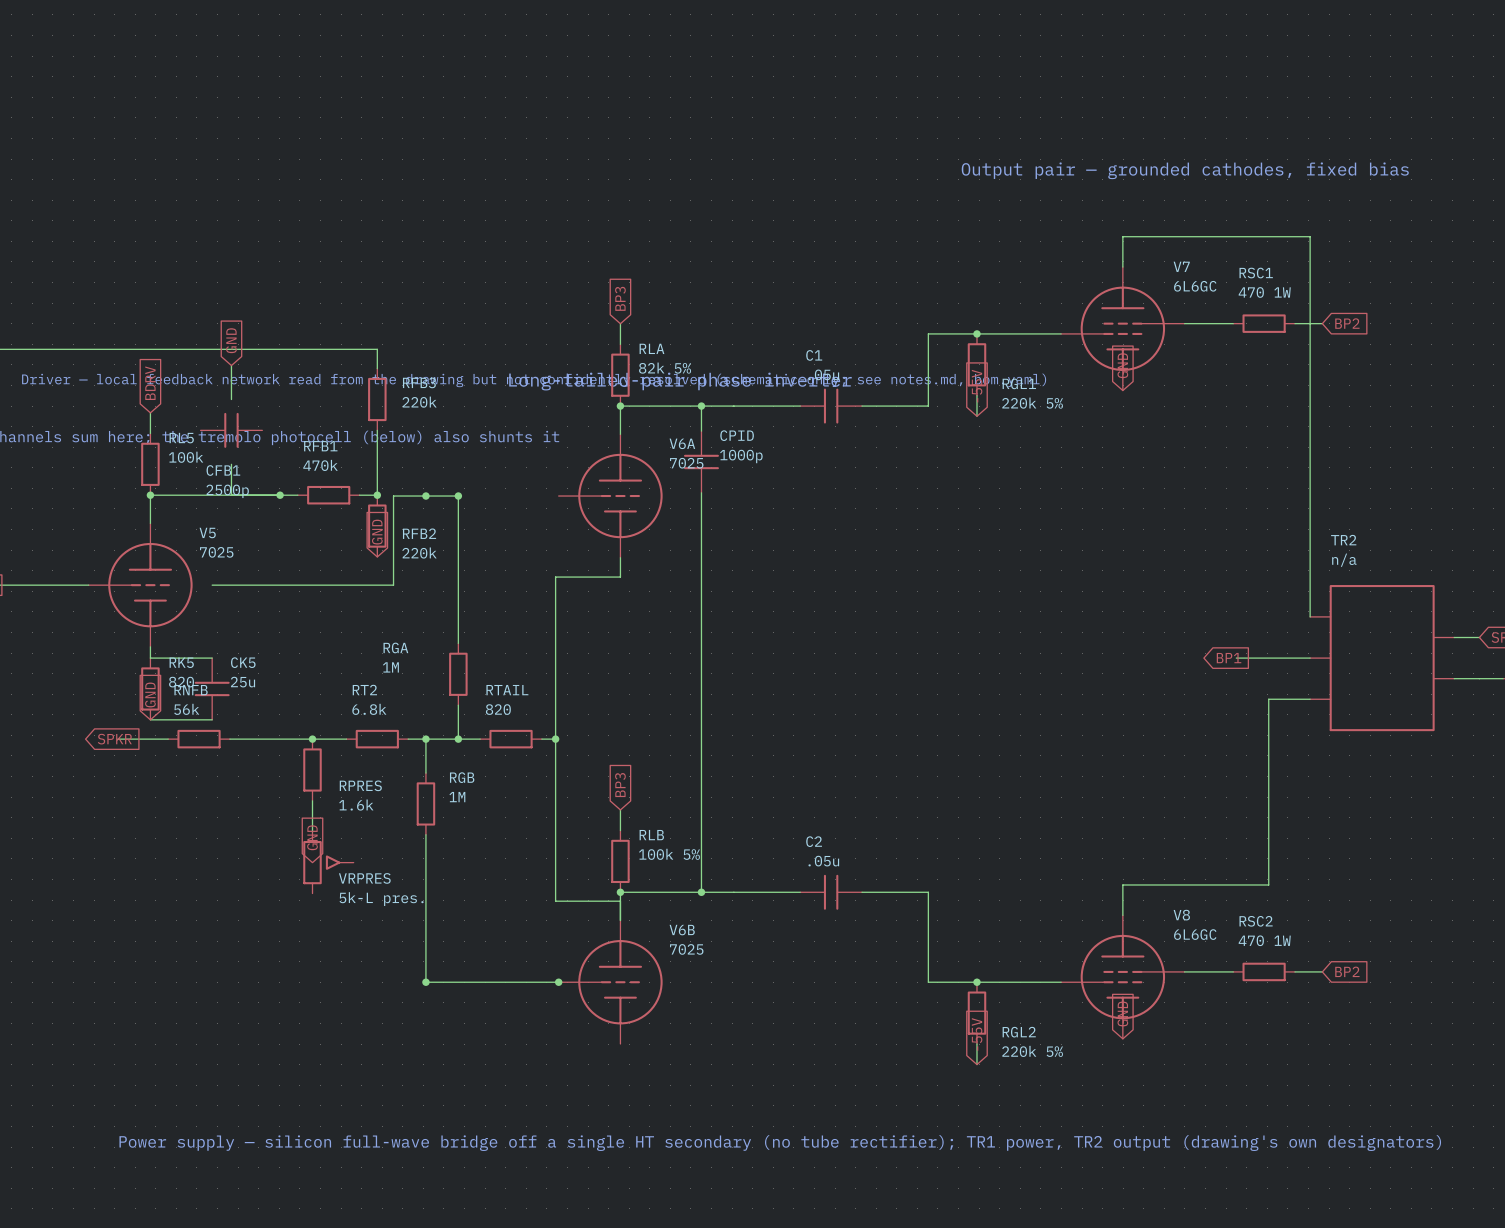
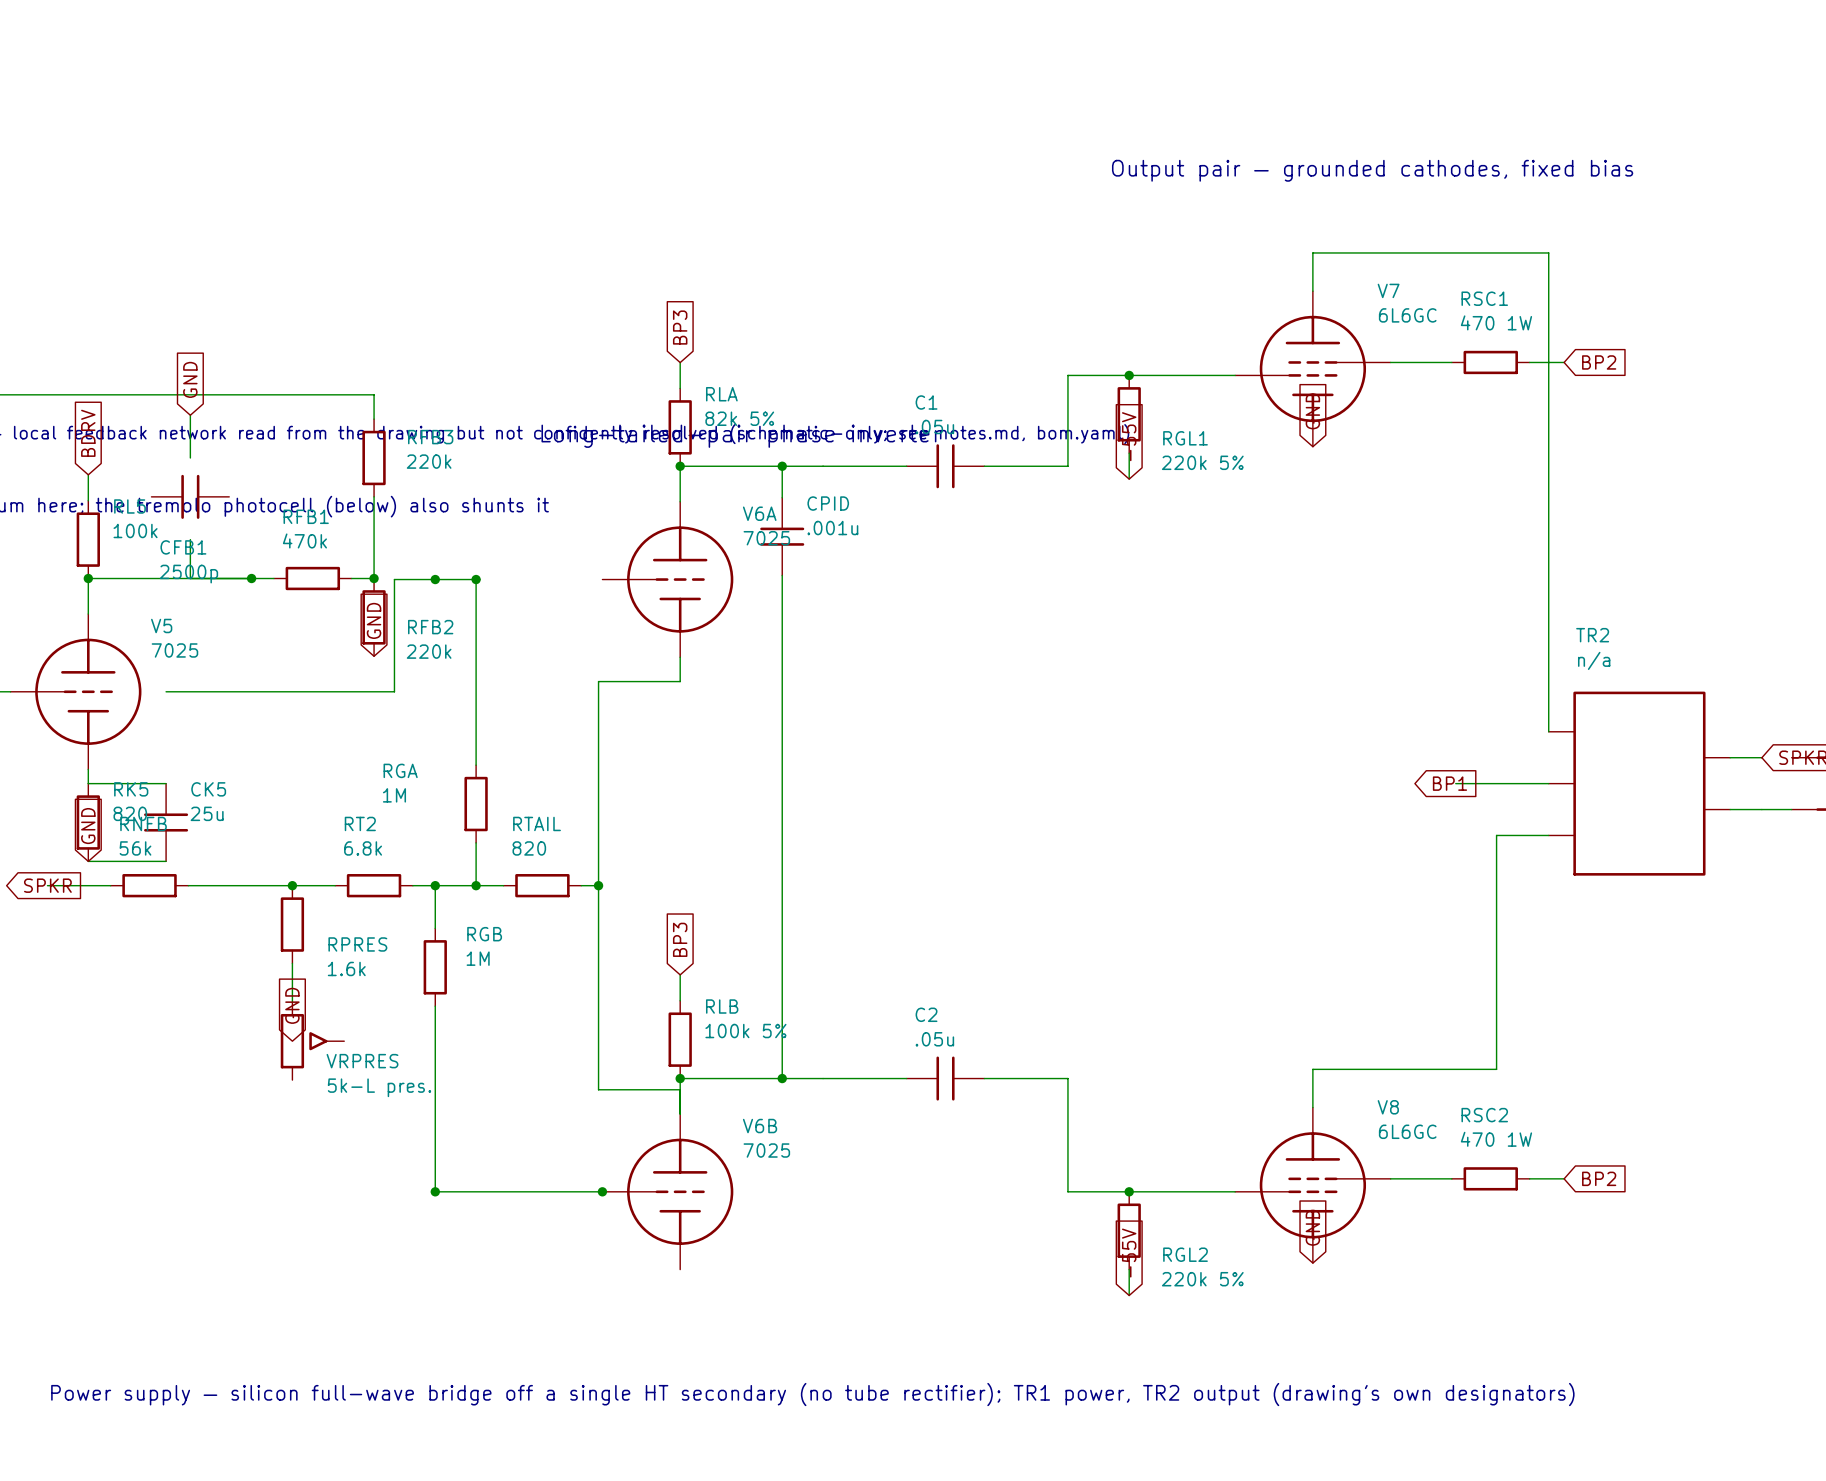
CPID value: 1000p (741, 456) -> .001u (832, 528)

